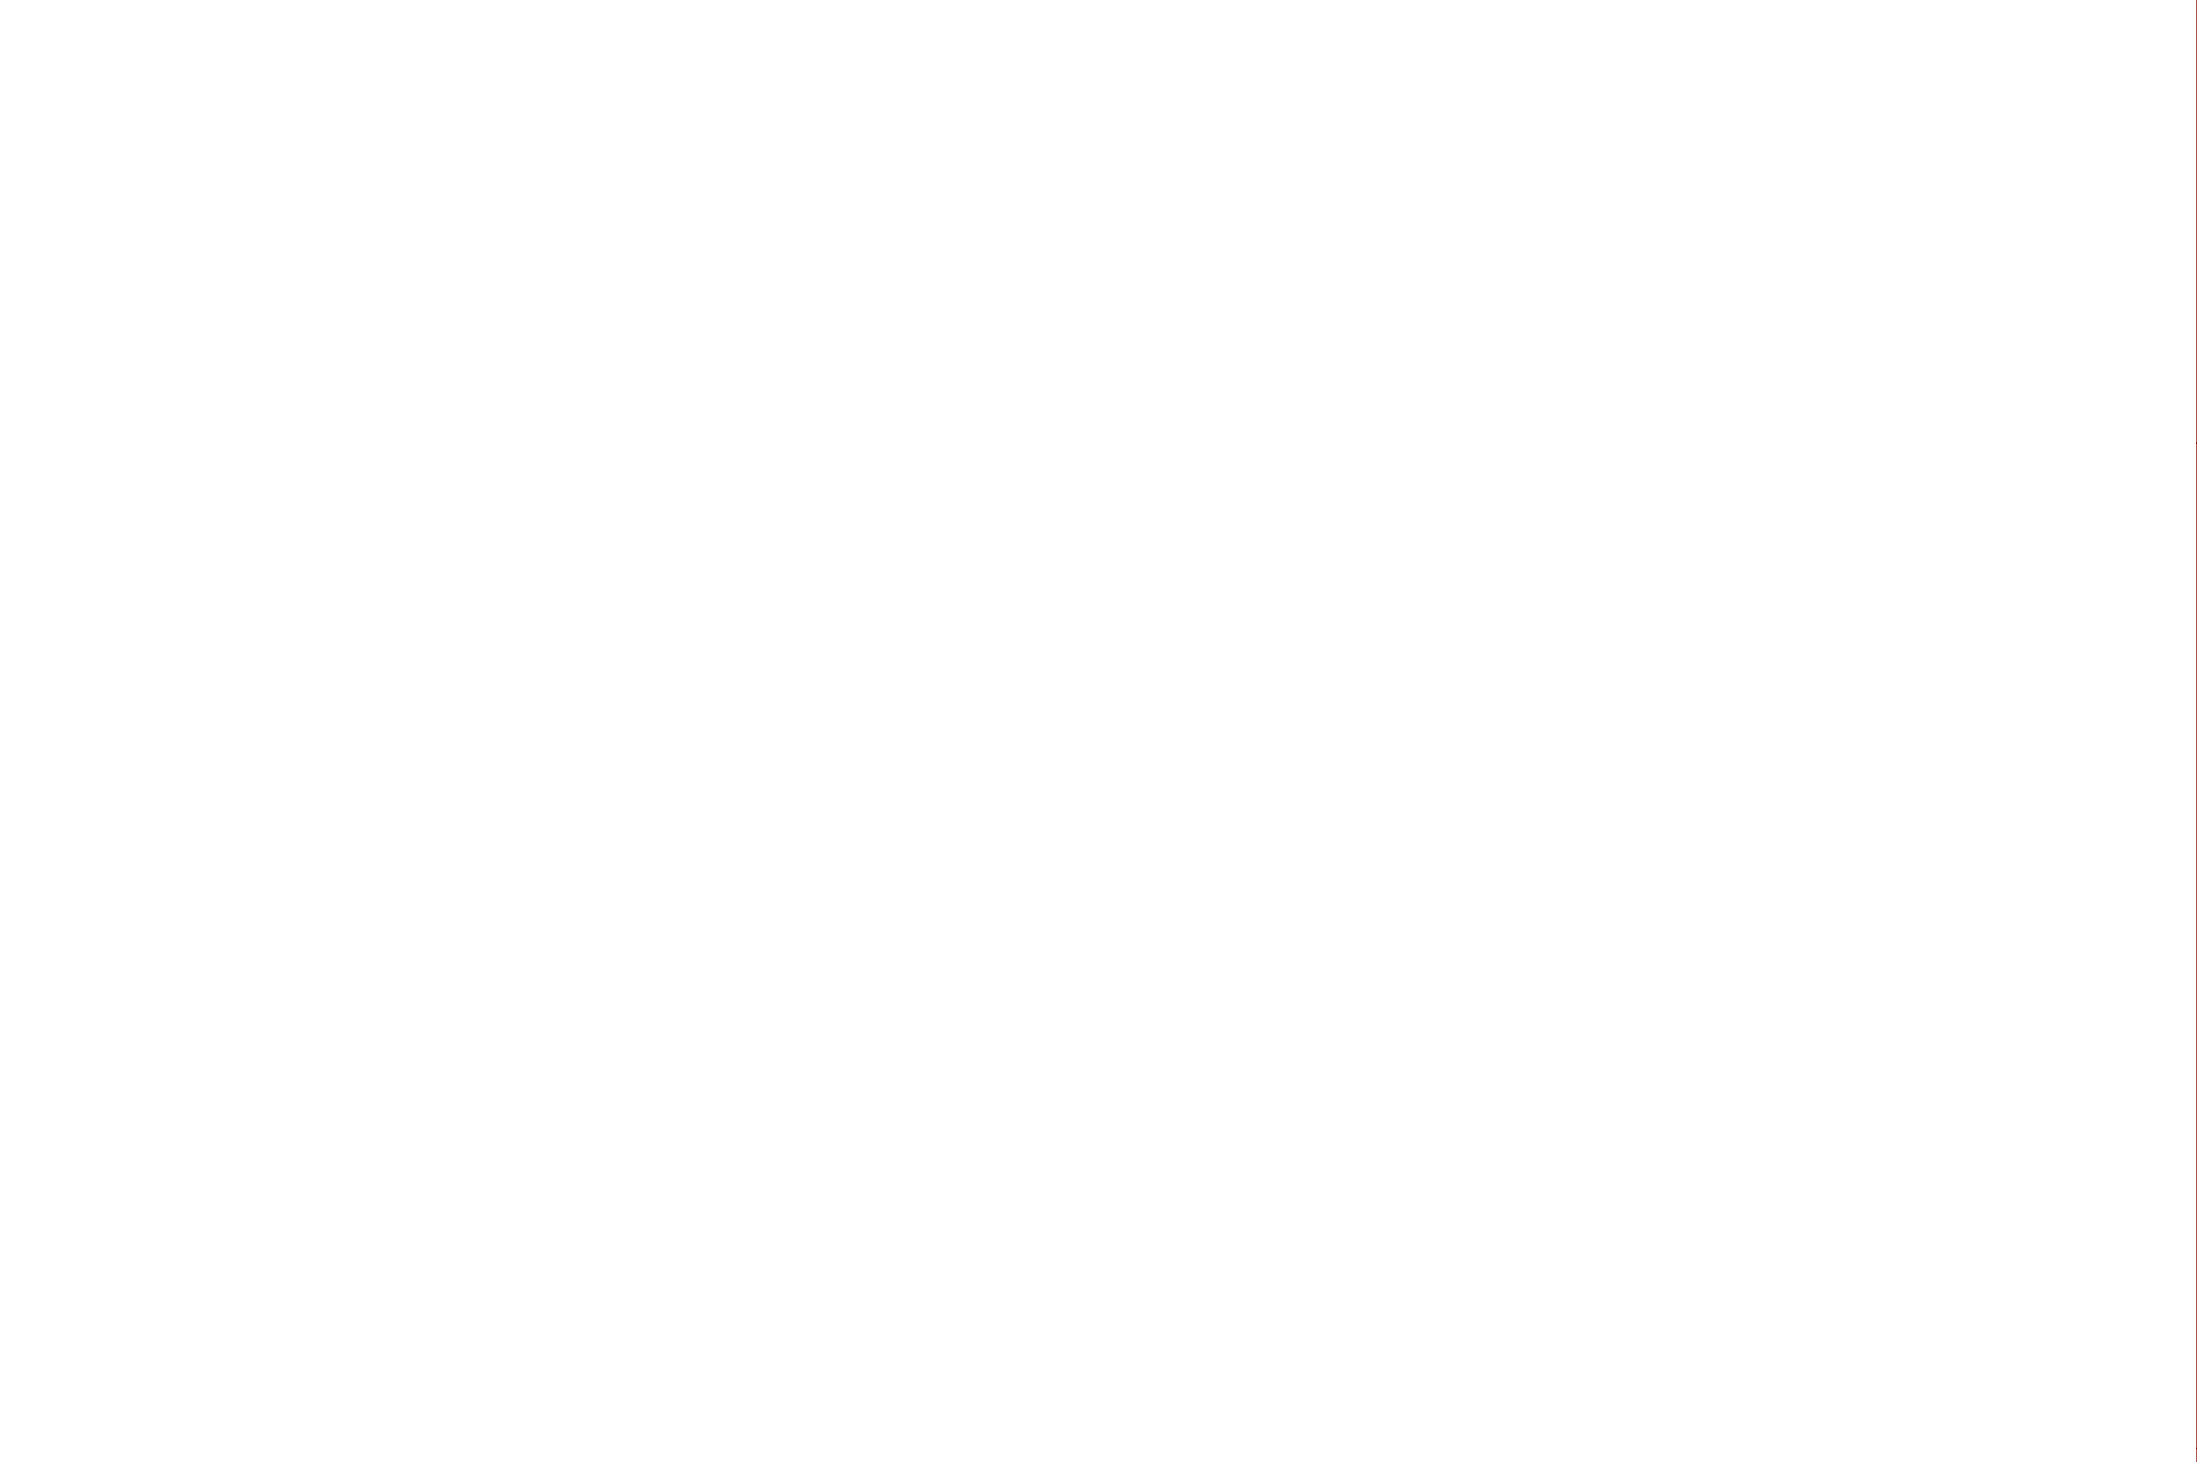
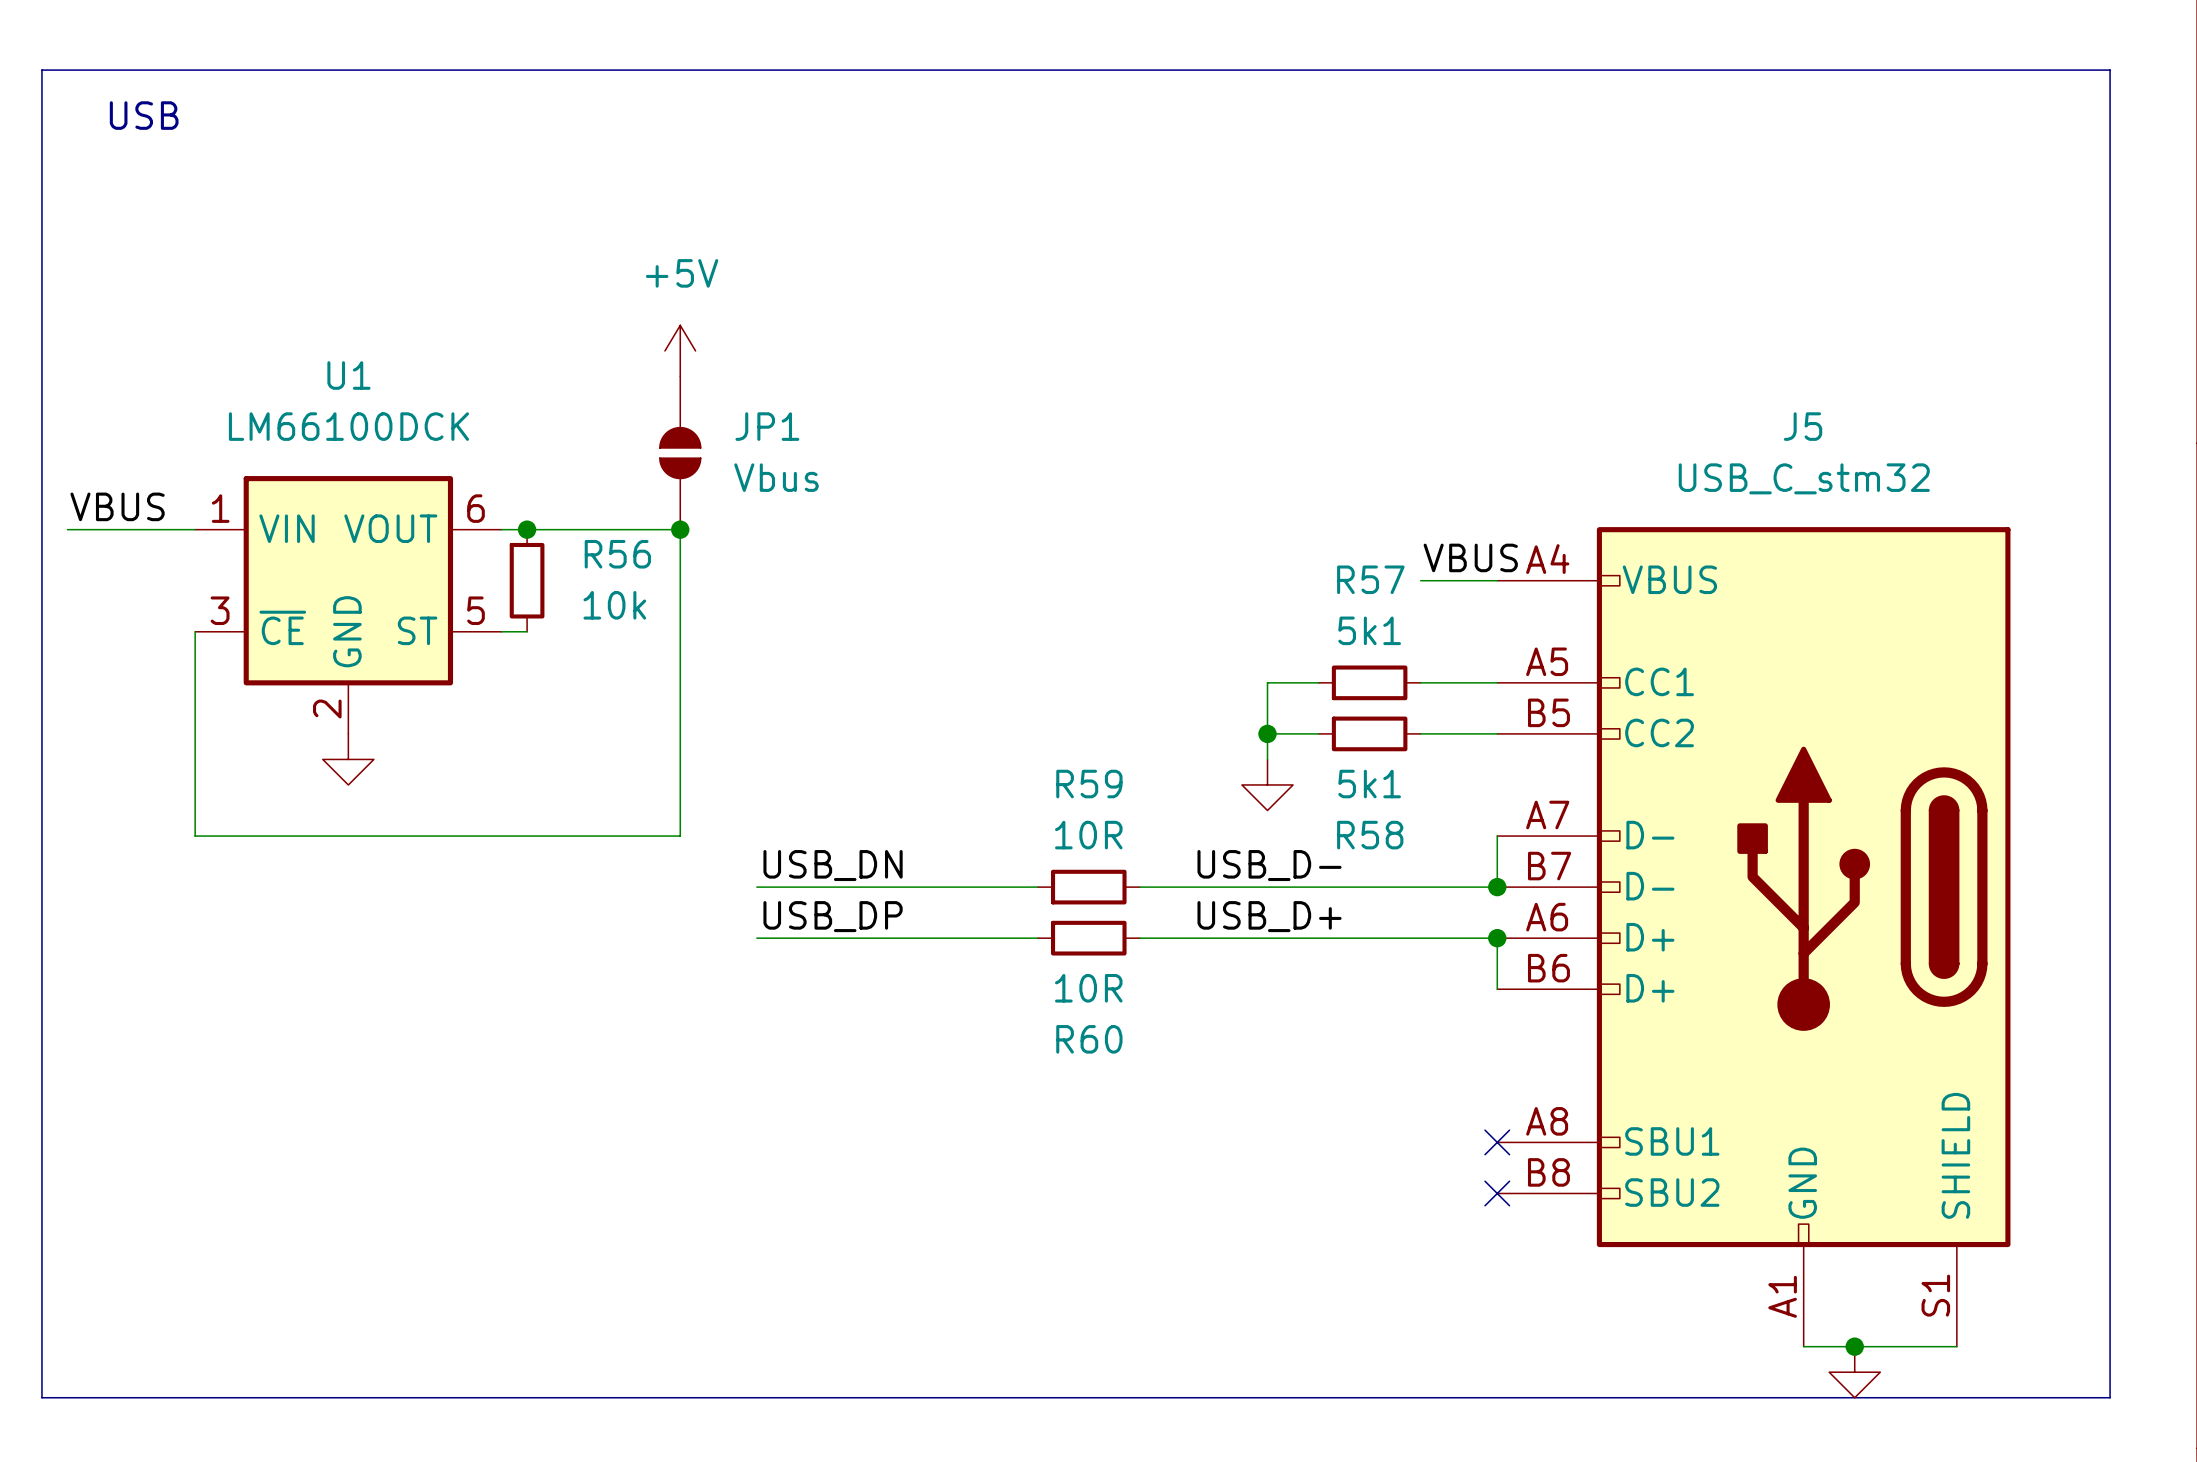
line: none -> (41, 70) (2110, 70) (2110, 1397) (41, 1397) (41, 70)
text: none -> USB (144, 115)
power symbol: none -> +5V (680, 350)
JP1: none -> Vbus (680, 453)
label: none -> VBUS (117, 506)
wire: none -> (67, 529) (195, 529)
wire: none -> (501, 529) (680, 529) (680, 836) (195, 836) (195, 631)
junction: none -> (527, 529)
junction: none -> (680, 529)
label: none -> VBUS (1470, 557)
R56: none -> 10k (527, 580)
wire: none -> (1420, 580) (1497, 580)
U1: none -> LM66100DCK (348, 604)
wire: none -> (501, 631) (527, 631)
wire: none -> (1318, 682) (1267, 682) (1267, 759)
R57: none -> 5k1 (1369, 682)
wire: none -> (1420, 682) (1497, 682)
wire: none -> (1267, 733) (1318, 733)
junction: none -> (1267, 733)
R58: none -> 5k1 (1369, 733)
wire: none -> (1420, 733) (1497, 733)
power symbol: none -> (348, 759)
power symbol: none -> (1267, 784)
wire: none -> (1497, 836) (1497, 887) (1139, 887)
label: none -> USB_DN (833, 865)
label: none -> USB_D- (1269, 865)
wire: none -> (756, 887) (1037, 887)
R59: none -> 10R (1088, 887)
junction: none -> (1497, 887)
label: none -> USB_DP (833, 916)
label: none -> USB_D+ (1269, 916)
J5: none -> USB_C_stm32 (1753, 936)
wire: none -> (756, 938) (1037, 938)
R60: none -> 10R (1088, 938)
wire: none -> (1139, 938) (1497, 938) (1497, 989)
junction: none -> (1497, 938)
no-connect mark: none -> (1497, 1142)
no-connect mark: none -> (1497, 1193)
wire: none -> (1803, 1346) (1956, 1346)
junction: none -> (1854, 1346)
power symbol: none -> (1854, 1372)

